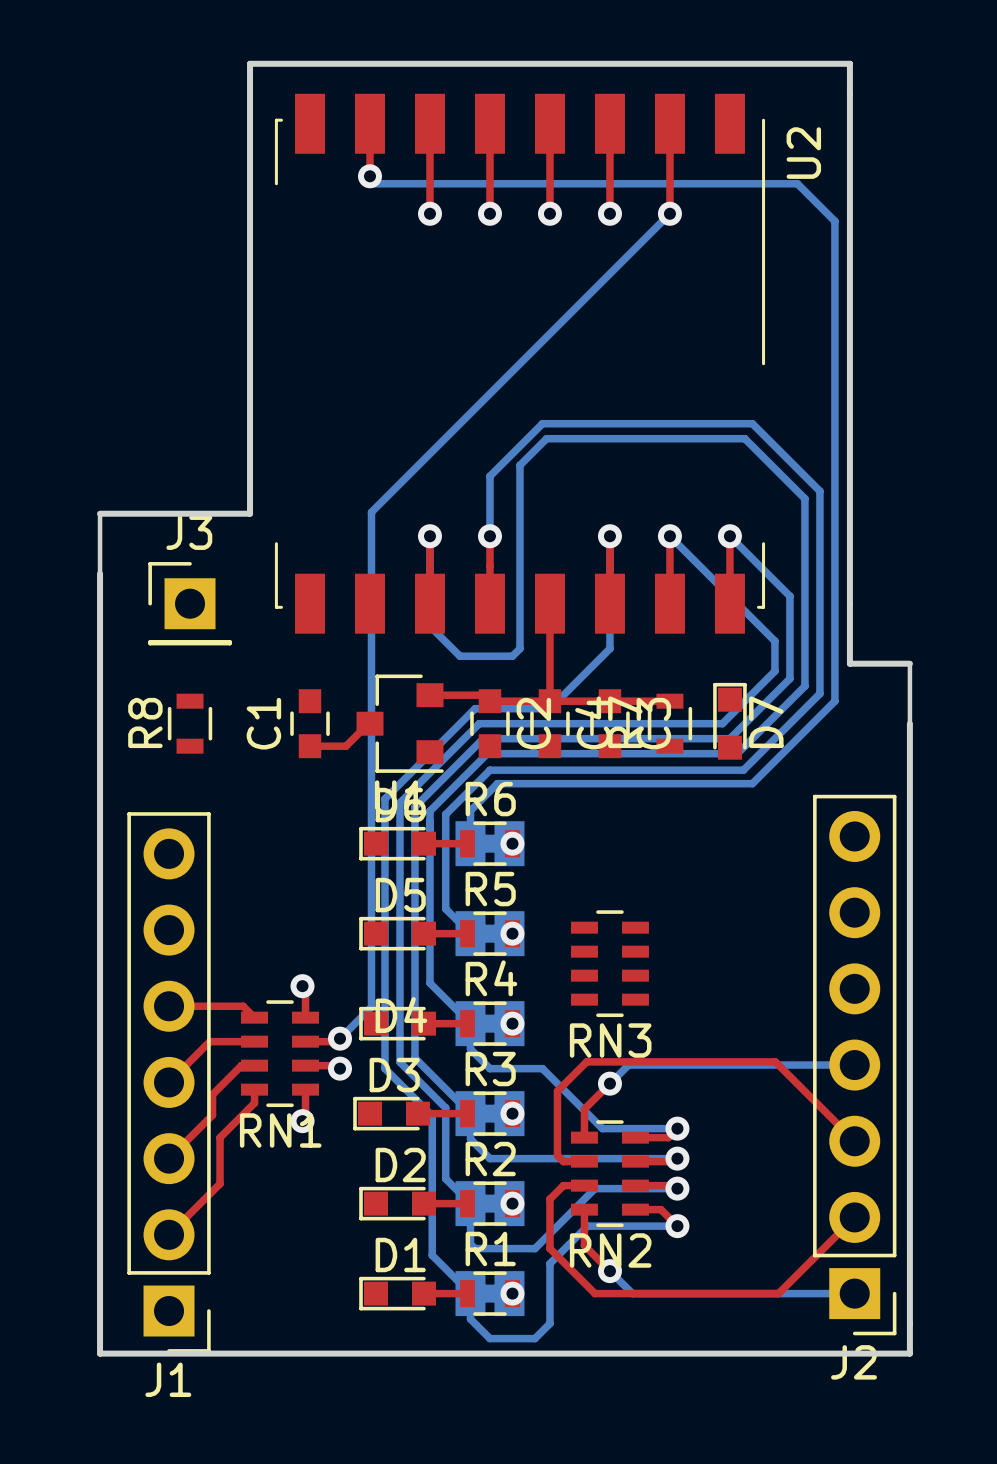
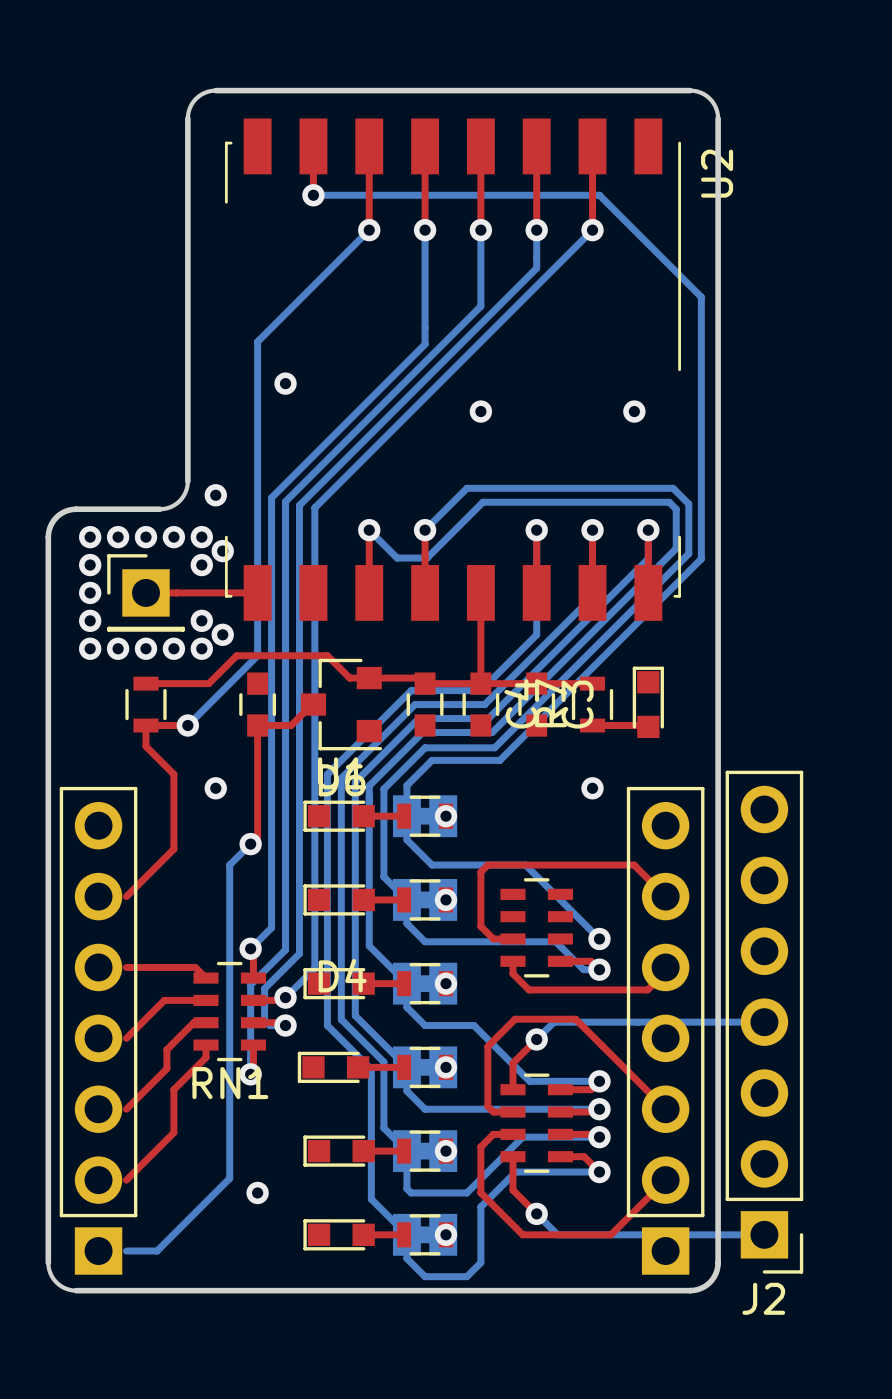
board edge: (265, 63) (250, 63) (250, 513) (205, 513) -> (215, 90) (198, 96) (191, 104) (188, 114) (187, 484) (179, 501) (170, 507) (159, 509)
board edge: (774, 63) (849, 63) (849, 663) (909, 663) (909, 1353) (774, 1353) -> (690, 90) (700, 92) (709, 98) (715, 107) (718, 118) (718, 1262) (715, 1273) (709, 1282) (700, 1288) (690, 1290)
bottom track: (370, 183) (797, 183) (834, 221) (834, 701) (752, 783) (570, 783) -> (306, 195) (599, 195) (701, 297) (701, 558) (499, 760)
bottom track: none -> (369, 230) (257, 341) (257, 655) (187, 725)
bottom track: none -> (425, 230) (425, 344) (271, 497) (271, 927) (250, 948)
bottom track: none -> (480, 230) (480, 306) (285, 501) (285, 949) (250, 984) (250, 1074)
bottom track: none -> (536, 230) (536, 268) (299, 505) (299, 953) (264, 988) (264, 1020) (269, 1025) (285, 1025)
via: none -> (285, 383)
via: none -> (480, 411)
via: none -> (634, 411)
via: none -> (215, 495)
board edge: (115, 513) (100, 513) (100, 1353) (115, 1353) -> (76, 509) (65, 511) (56, 517) (50, 526) (48, 537) (48, 1262) (50, 1273) (56, 1282) (65, 1288) (76, 1290)
J3 name: J3 (189, 532) -> none
bottom track: (429, 536) (429, 626) (459, 656) (512, 656) (519, 648) (519, 465) (546, 438) (744, 438) (804, 498) (804, 686) (737, 753) (562, 753) -> (369, 530) (397, 558) (427, 558) (482, 502) (669, 502) (676, 509) (676, 548) (492, 732)
bottom track: (489, 536) (489, 476) (542, 423) (752, 423) (819, 491) (819, 693) (743, 770) (564, 770) -> (425, 530) (466, 488) (673, 488) (688, 504) (688, 553) (494, 747)
bottom track: (669, 536) (774, 641) (774, 671) (722, 723) (554, 723) -> (592, 530) (592, 596) (484, 704)
bottom track: (729, 536) (789, 596) (789, 678) (729, 738) (558, 738) -> (648, 530) (648, 558) (488, 718)
via: none -> (90, 537)
via: none -> (118, 537)
via: none -> (145, 537)
via: none -> (173, 537)
via: none -> (201, 537)
via: none -> (222, 551)
via: none -> (90, 565)
via: none -> (201, 565)
via: none -> (90, 592)
top track: none -> (145, 592) (257, 592)
via: none -> (90, 620)
via: none -> (201, 620)
via: none -> (222, 634)
via: none -> (90, 648)
via: none -> (118, 648)
via: none -> (145, 648)
via: none -> (173, 648)
via: none -> (201, 648)
top track: none -> (369, 678) (349, 678) (327, 655) (236, 655) (208, 683) (145, 683)
R8 name: R8 (145, 722) -> none
D7 name: D7 (766, 722) -> none
C1 name: C1 (263, 723) -> none
C2 name: C2 (533, 723) -> none
top track: none -> (187, 725) (145, 725) (145, 746) (173, 774) (173, 849) (126, 896)
via: none -> (187, 725)
top track: none -> (257, 725) (257, 837) (250, 844)
top track: none -> (592, 725) (648, 726)
R6 name: R6 (490, 799) -> none
via: none -> (215, 788)
via: none -> (592, 788)
bottom track: none -> (406, 816) (406, 839) (432, 865) (525, 865) (599, 939)
bottom track: none -> (250, 844) (229, 865) (229, 1178) (157, 1251) (126, 1251)
via: none -> (250, 844)
R5 name: R5 (490, 889) -> none
D5 name: D5 (400, 895) -> none
top track: none -> (665, 896) (634, 865) (487, 865) (480, 872) (480, 926) (493, 939) (512, 939)
bottom track: none -> (406, 899) (406, 923) (425, 941) (555, 941) (583, 969) (599, 969)
via: none -> (599, 939)
R4 name: R4 (491, 978) -> none
top track: none -> (512, 961) (512, 973) (529, 989) (647, 989) (665, 971) (665, 967)
top track: none -> (560, 961) (591, 961) (599, 969)
via: none -> (599, 969)
RN3 name: RN3 (610, 1040) -> none
top track: (651, 1061) (775, 1061) (854, 1141) -> (575, 1019) (665, 1109)
R3 name: R3 (490, 1069) -> none
part: none -> (98, 1030)
part: none -> (665, 1030)
D3 name: D3 (394, 1075) -> none
J1: (169, 1082) -> none
R2 name: R2 (490, 1159) -> none
D2 name: D2 (400, 1165) -> none
top track: (854, 1217) (778, 1293) (689, 1293) -> (665, 1180) (610, 1234)
via: none -> (257, 1192)
R1 name: R1 (490, 1248) -> none
RN2 name: RN2 (610, 1250) -> none
D1 name: D1 (400, 1254) -> none

